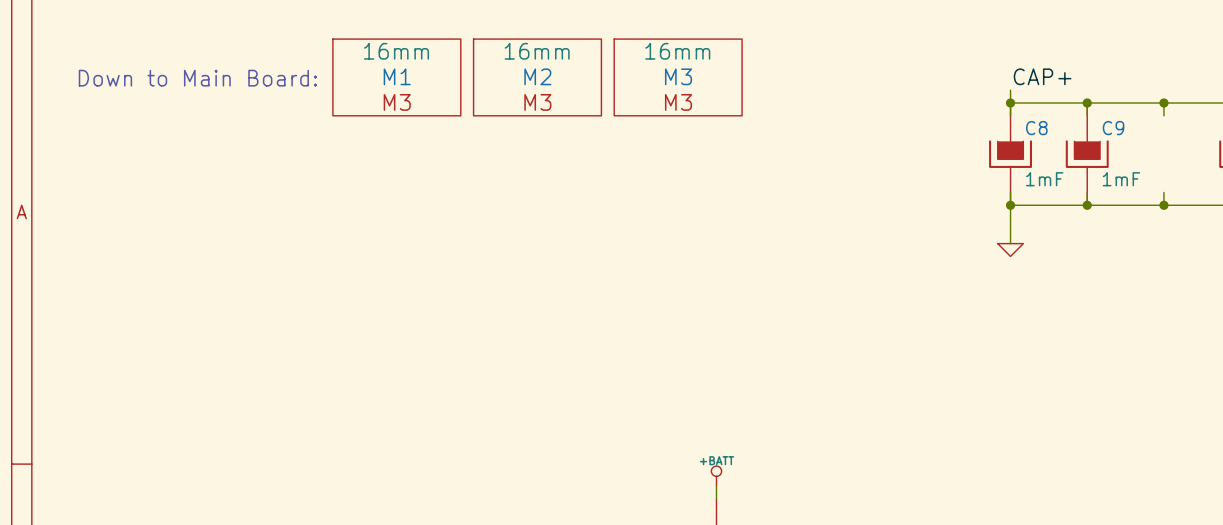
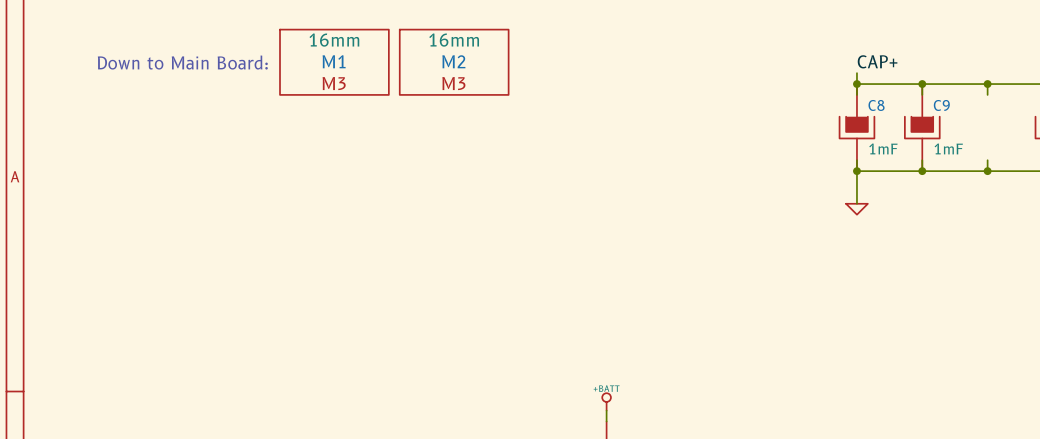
M3: 16mm (678, 77) -> none

